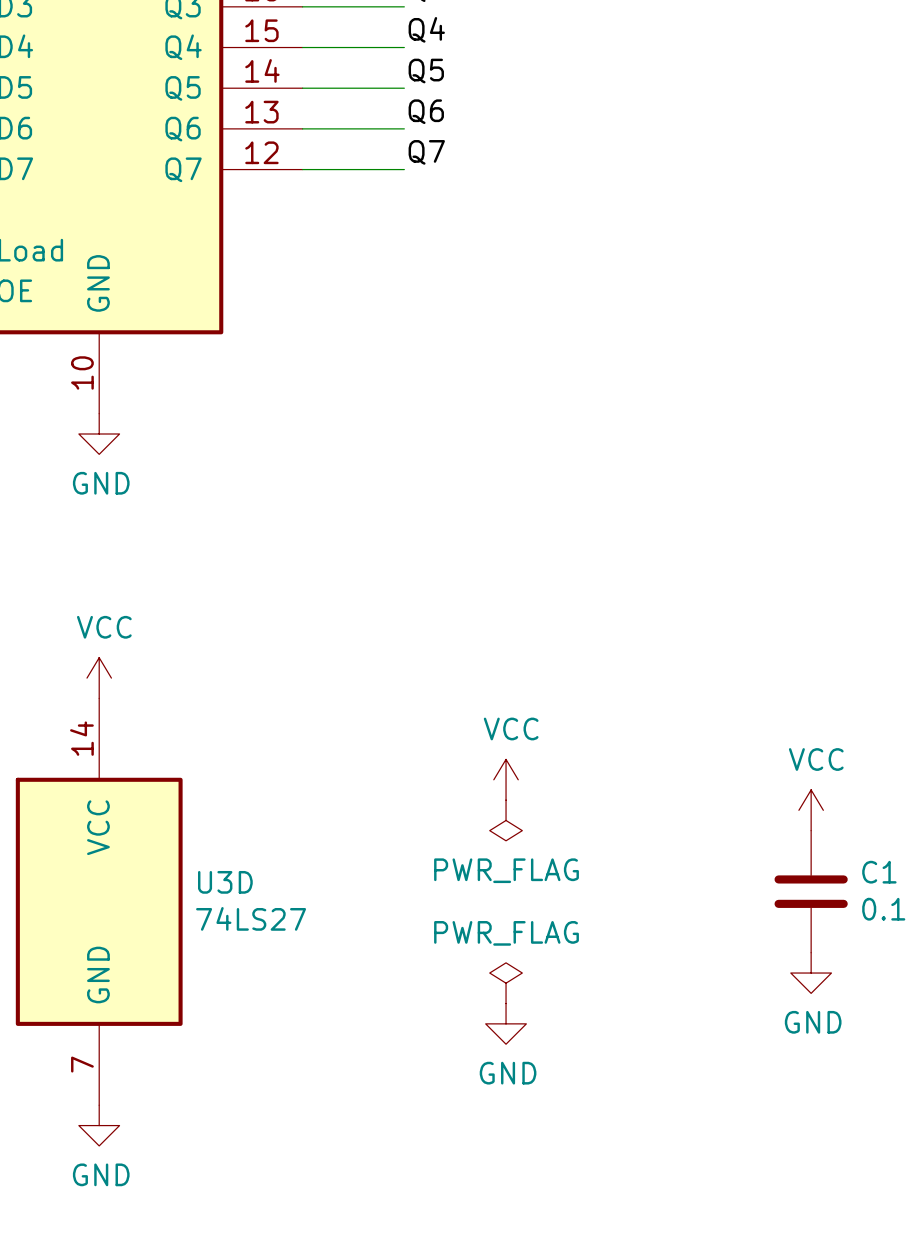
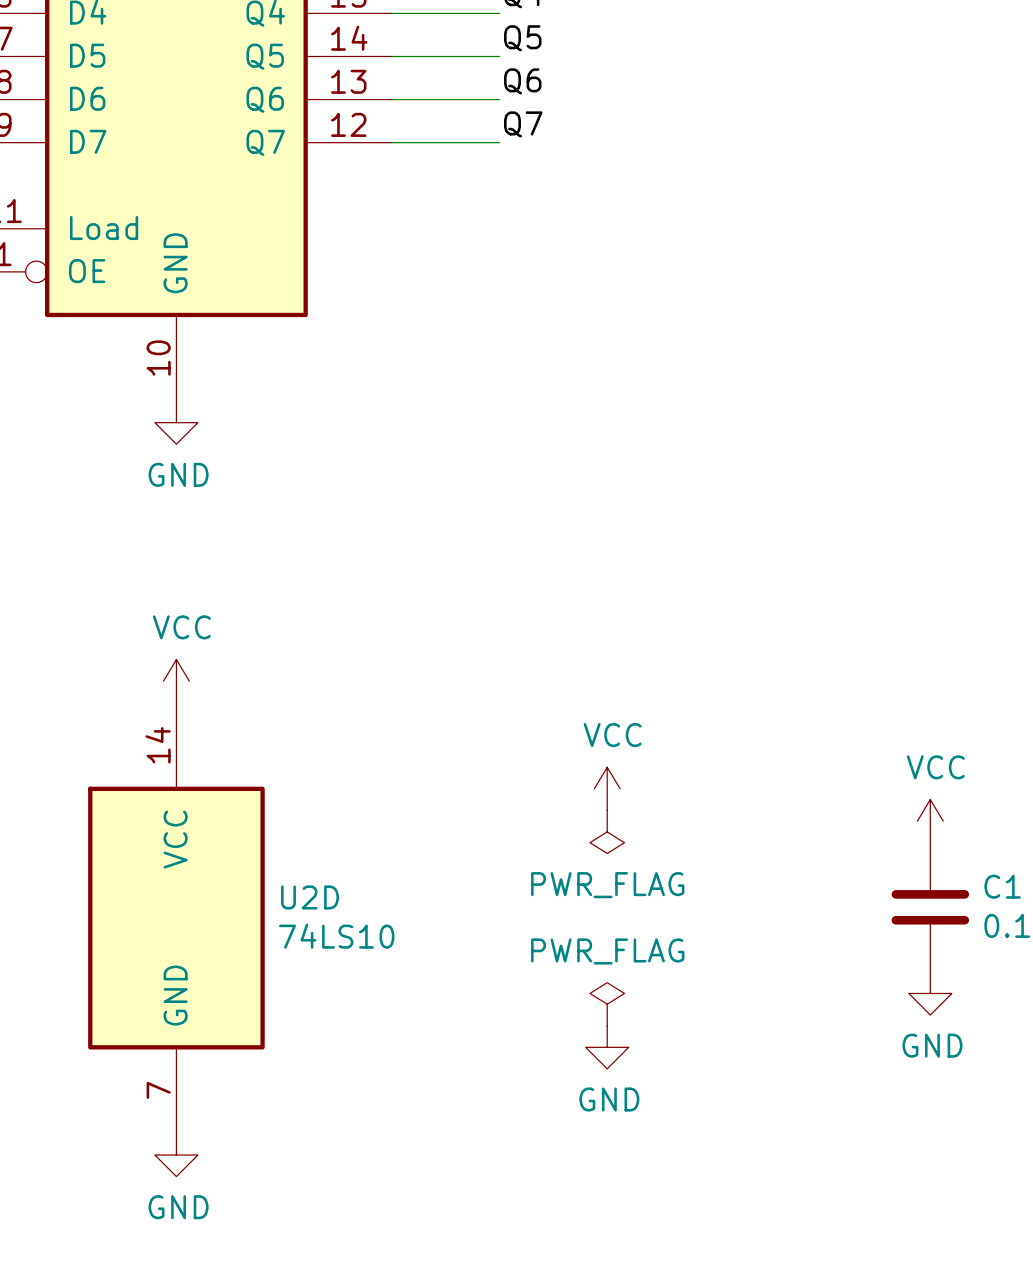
U3D name: U3D (225, 882) -> U2D (310, 897)
U3D value: 74LS27 (251, 918) -> 74LS10 (336, 936)

